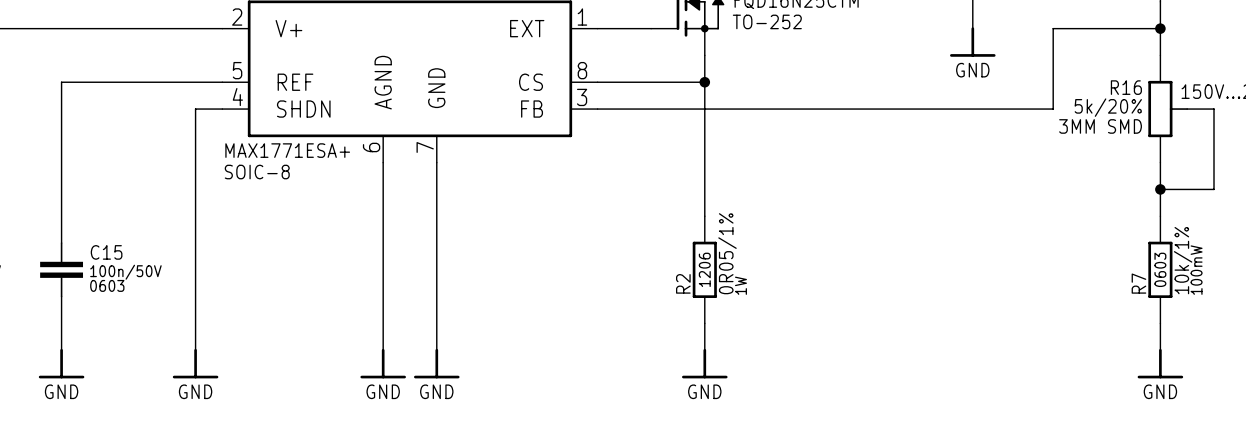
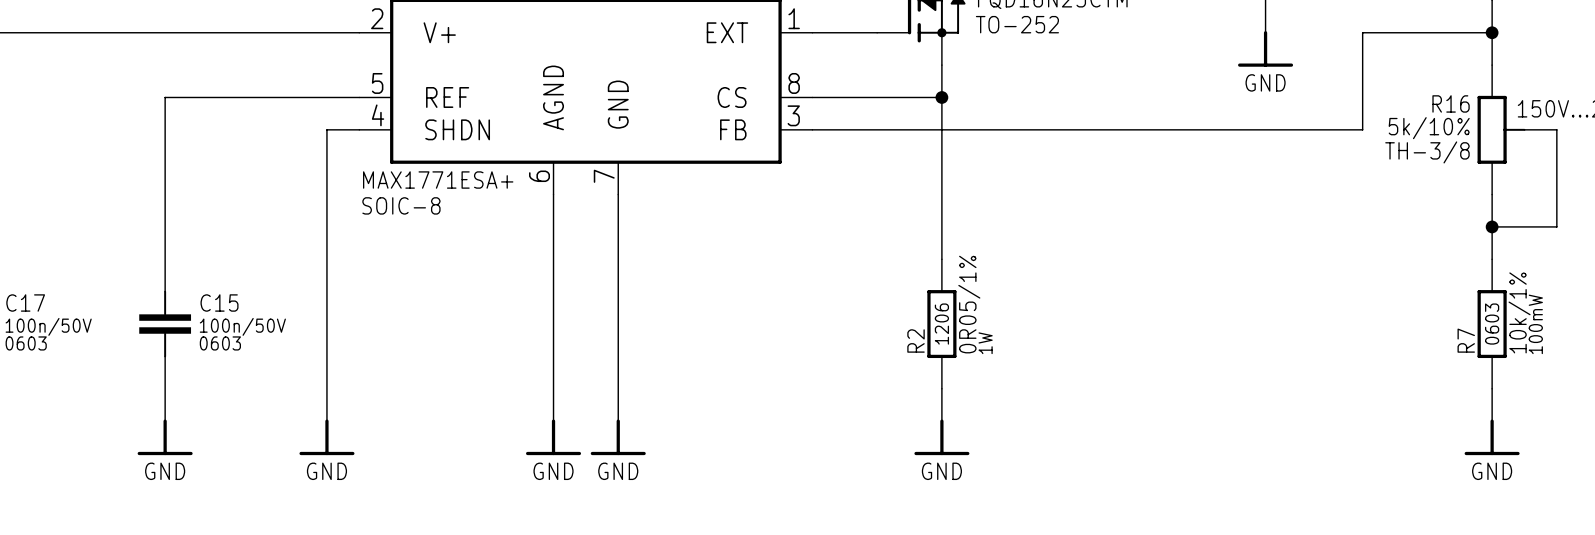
R16 value: 5k/20% (1108, 107) -> 5k/10% (1429, 128)
R16 text: 3MM SMD (1100, 126) -> TH-3/8 (1427, 152)

